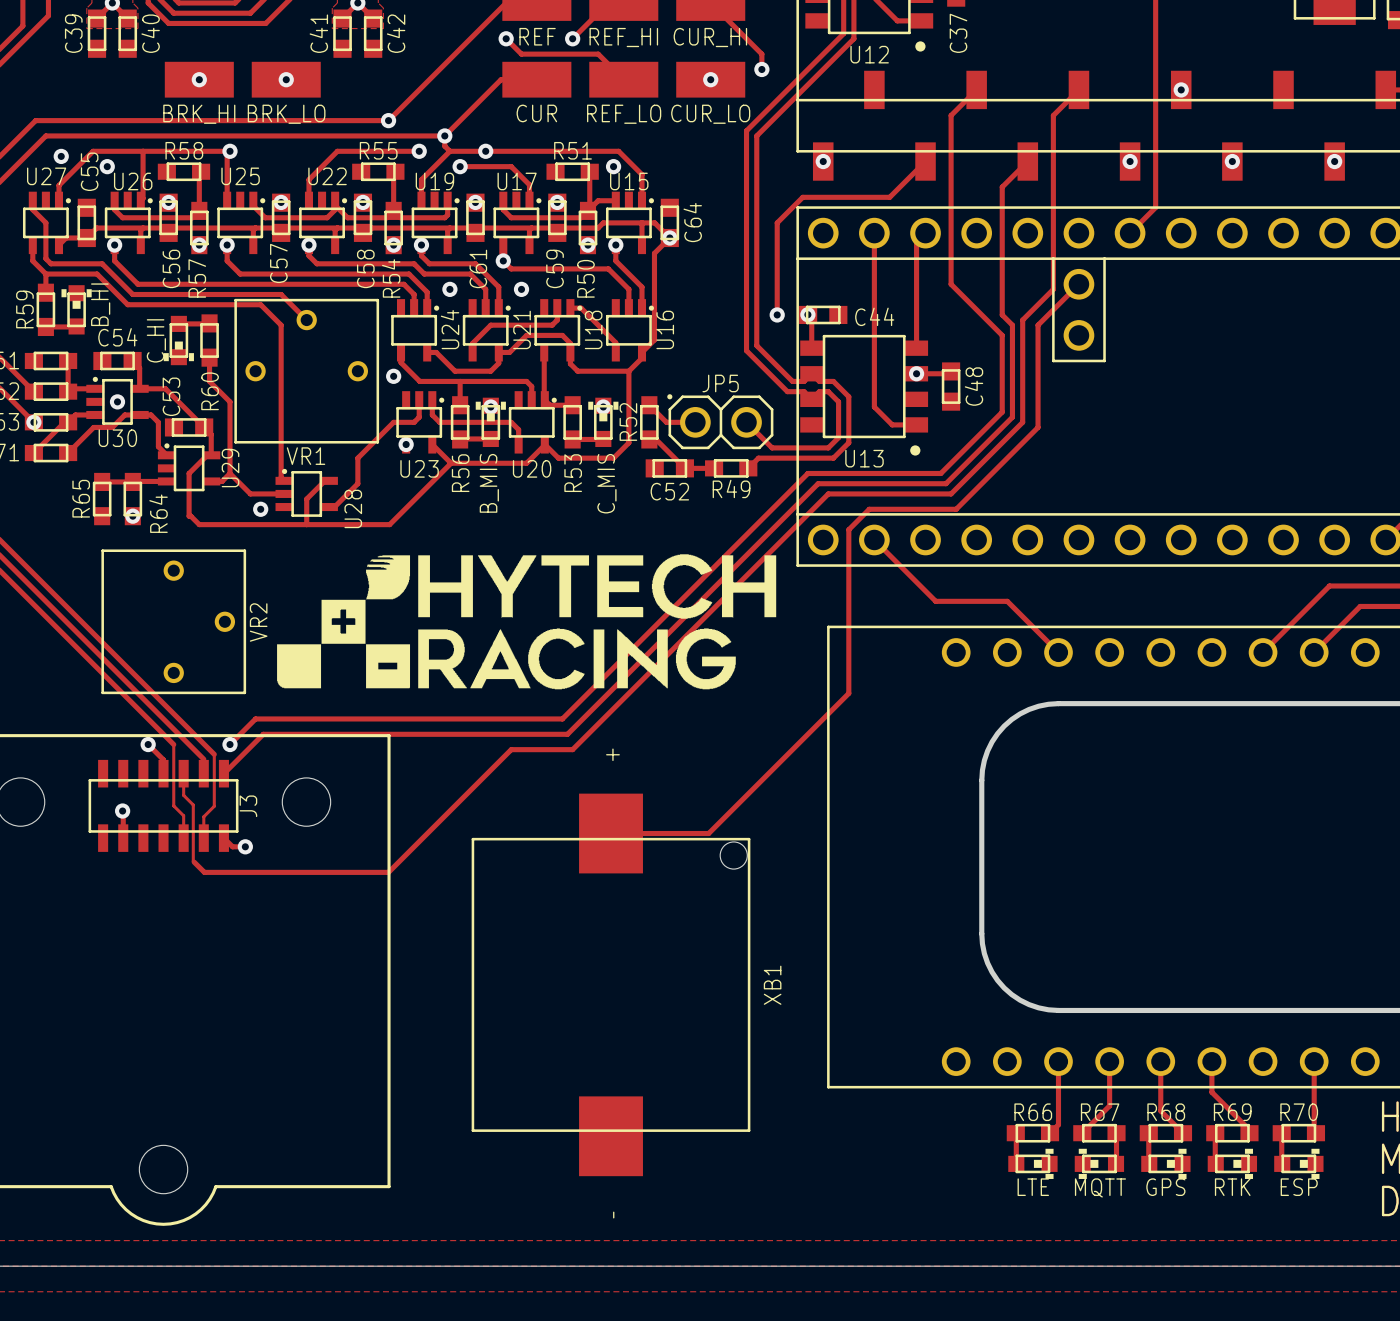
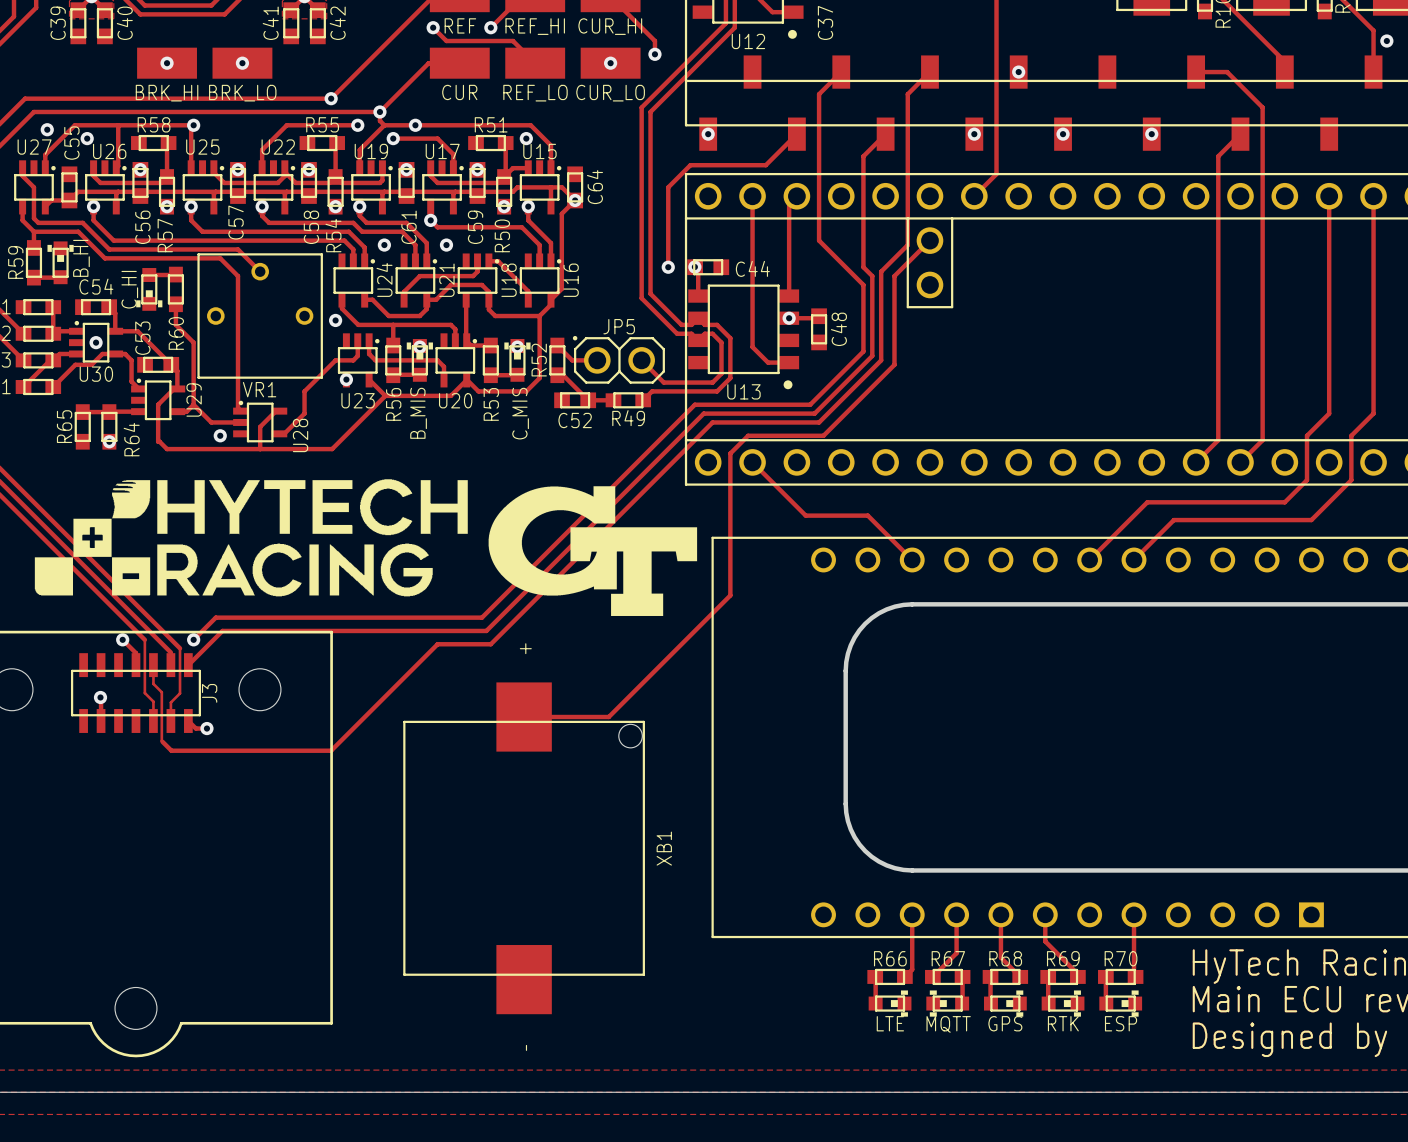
via: (33, 422) -> none
drawing: none -> [488, 486, 698, 616]
VR2: (173, 621) -> none
drawing position: (526, 621) -> (251, 537)

